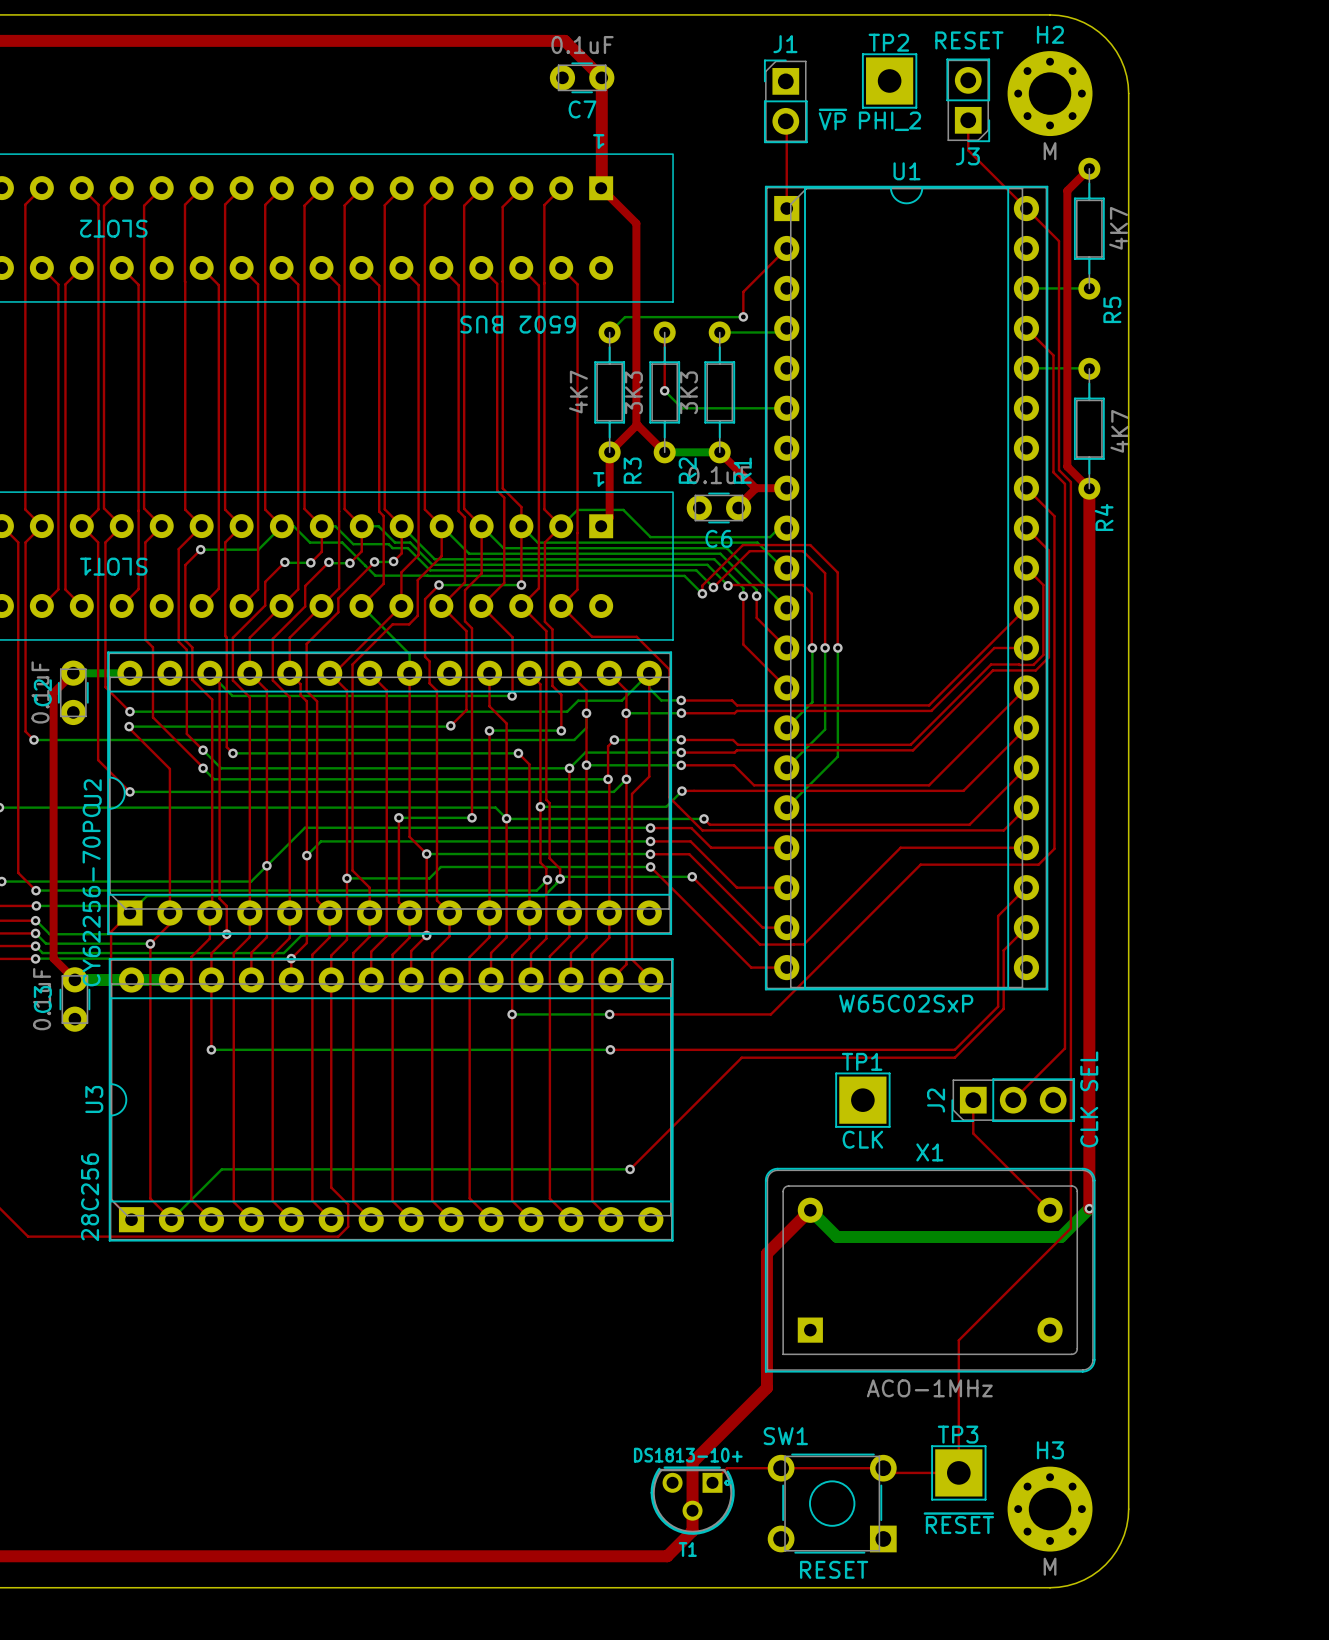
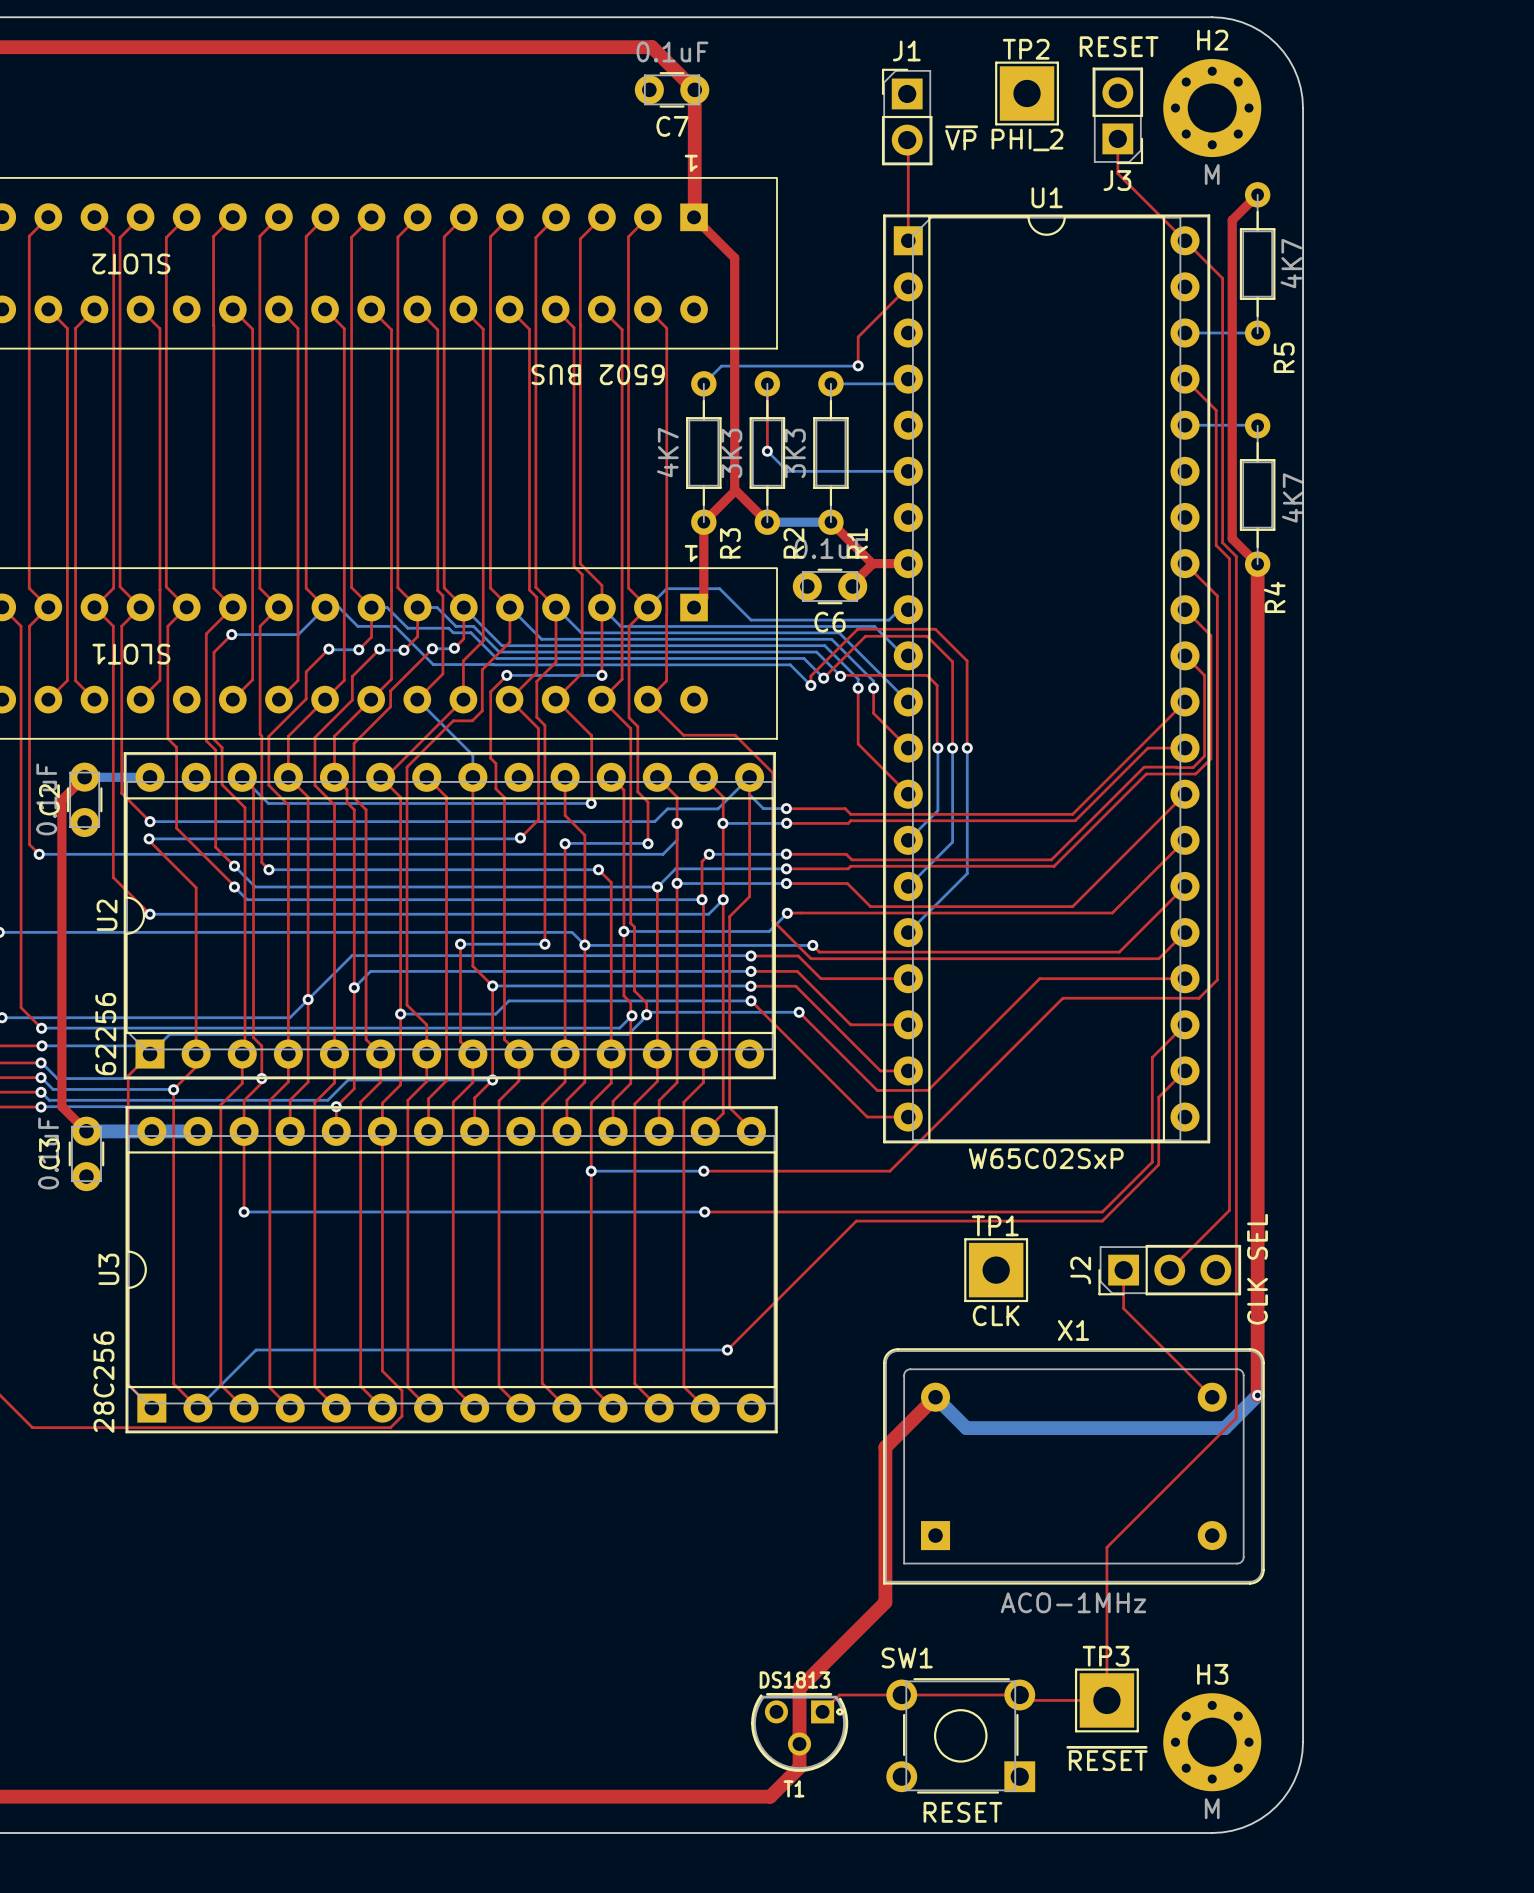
U2 value: CY62256-70PC (91, 895) -> 62256 (105, 1034)
T1 value: DS1813-10+ (688, 1455) -> DS1813 (794, 1679)

